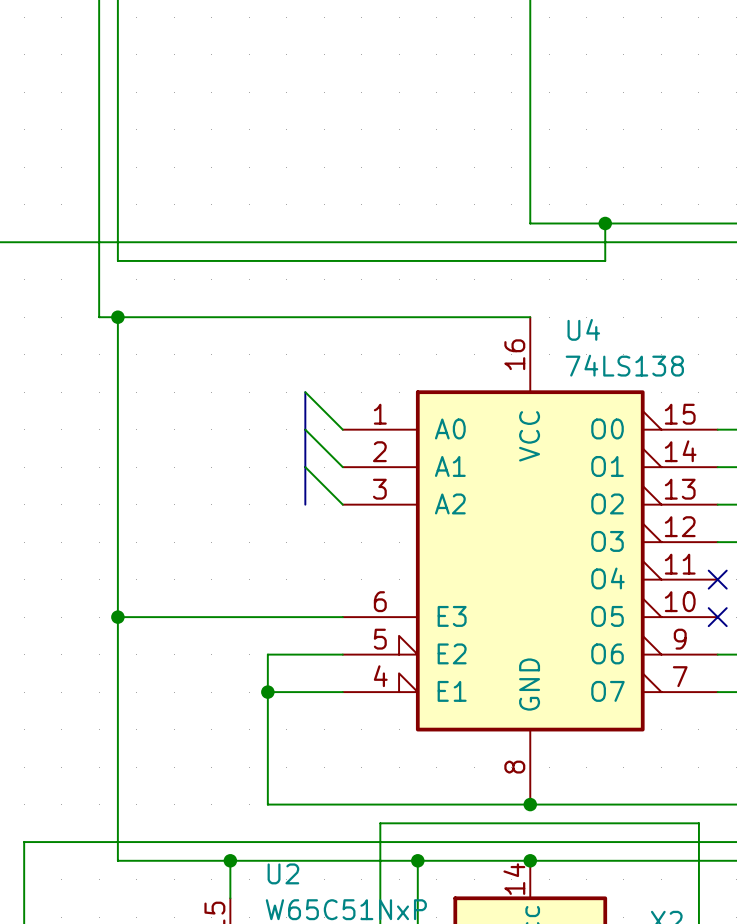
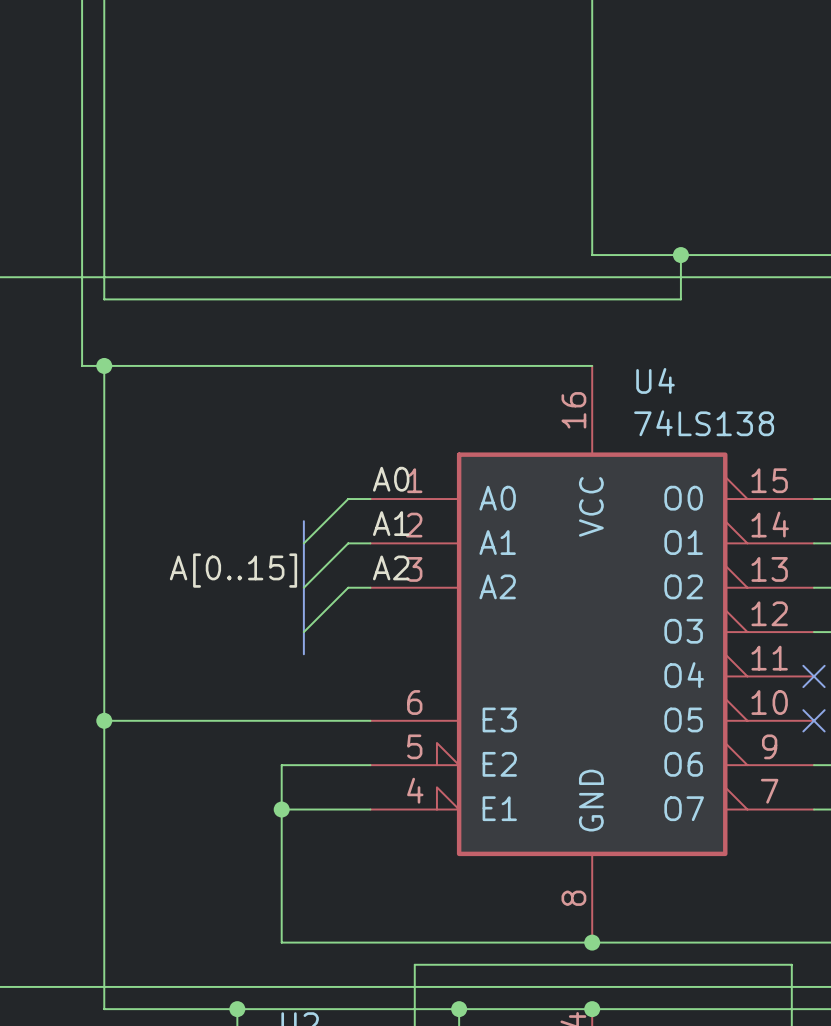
wire: (305, 392) (342, 429) -> (303, 543) (348, 499) (370, 499)
bus: (305, 392) (305, 504) -> (303, 521) (303, 654)
label: none -> A0 (391, 479)
wire: (305, 429) (342, 467) -> (303, 587) (348, 543) (370, 543)
label: none -> A1 (391, 523)
wire: (305, 467) (342, 504) -> (303, 632) (348, 587) (370, 587)
label: none -> A2 (391, 567)
label: none -> A[0..15] (233, 570)

